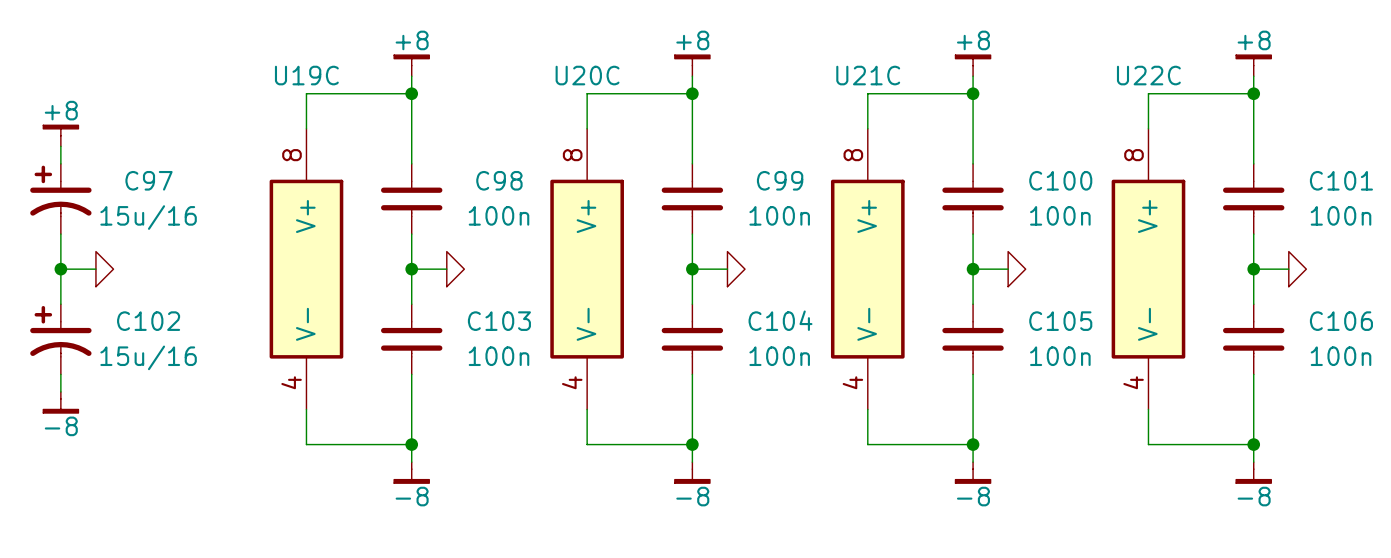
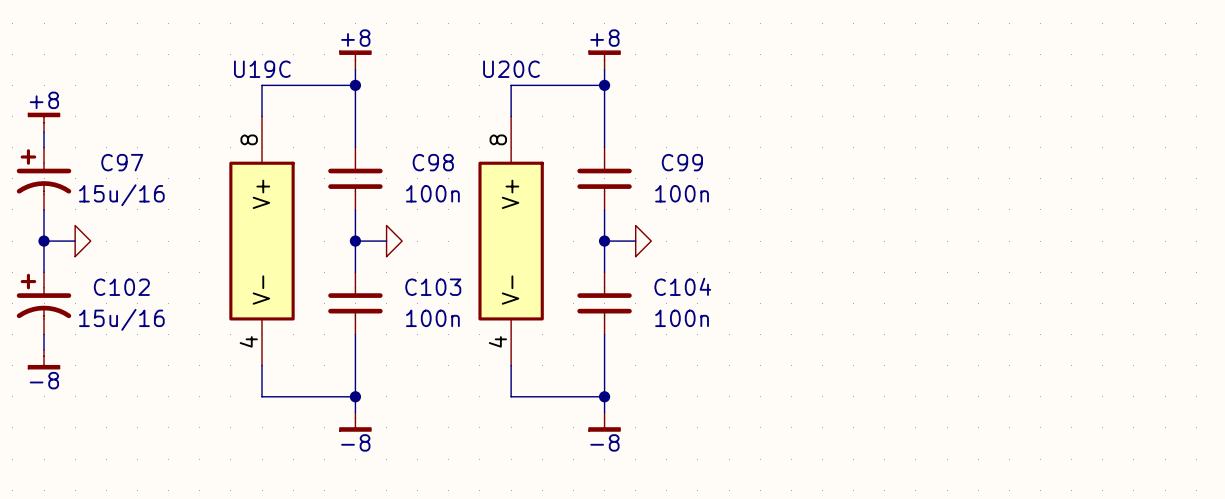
power symbol: +8 (973, 65) -> none
power symbol: +8 (1253, 65) -> none
wire: (973, 76) (973, 163) -> none
wire: (1253, 76) (1253, 163) -> none
wire: (973, 93) (867, 93) (867, 128) -> none
junction: (973, 93) -> none
wire: (1253, 93) (1148, 93) (1148, 128) -> none
junction: (1253, 93) -> none
C100: 100n (973, 198) -> none
C101: 100n (1253, 198) -> none
wire: (973, 234) (973, 304) -> none
wire: (1253, 234) (1253, 304) -> none
U21C: (867, 269) -> none
wire: (973, 269) (1008, 269) -> none
junction: (973, 269) -> none
power symbol: (1016, 269) -> none
U22C: (1148, 269) -> none
wire: (1253, 269) (1288, 269) -> none
junction: (1253, 269) -> none
power symbol: (1297, 269) -> none
C105: 100n (973, 339) -> none
C106: 100n (1253, 339) -> none
wire: (973, 374) (973, 462) -> none
wire: (1253, 374) (1253, 462) -> none
wire: (867, 409) (867, 444) (973, 444) -> none
wire: (1148, 409) (1148, 444) (1253, 444) -> none
junction: (973, 444) -> none
junction: (1253, 444) -> none
power symbol: -8 (973, 472) -> none
power symbol: -8 (1253, 472) -> none

